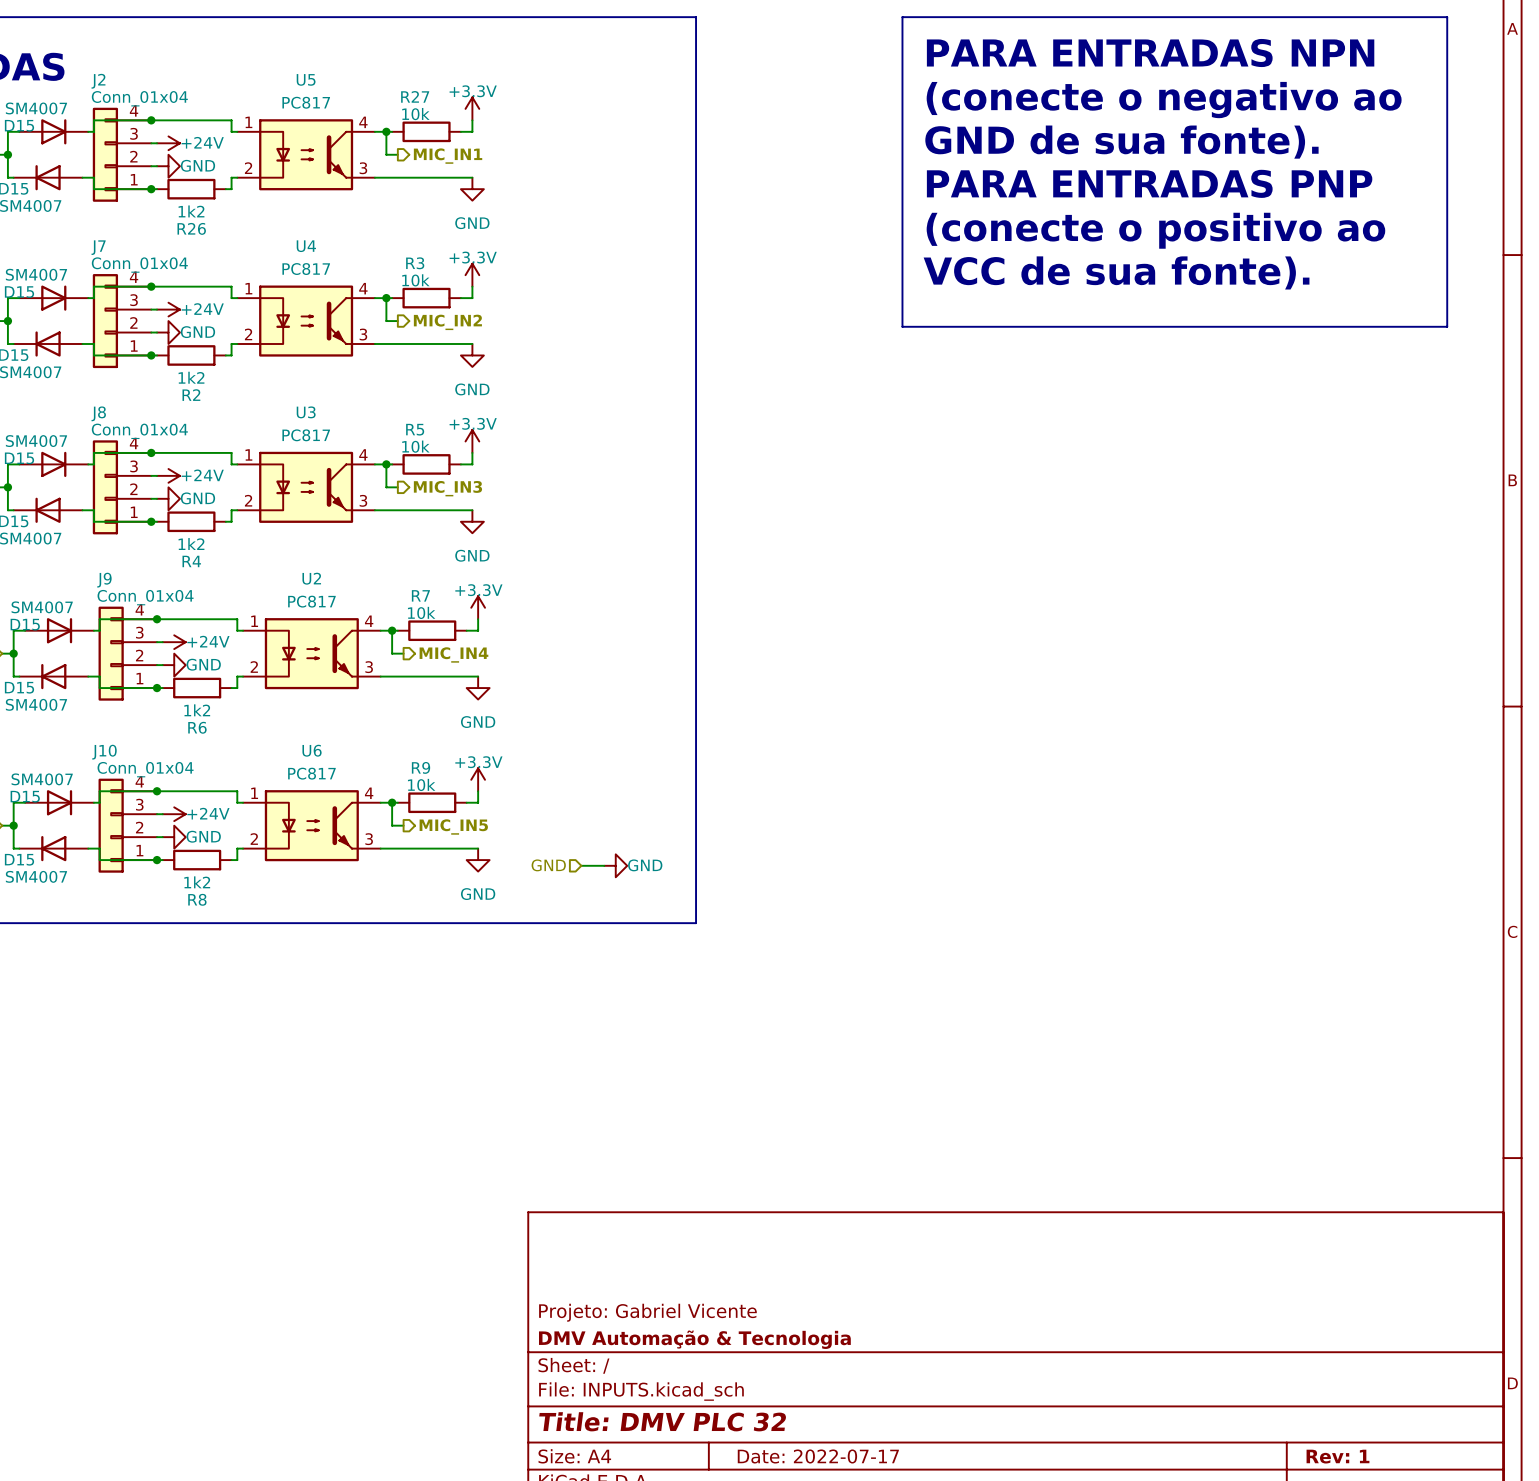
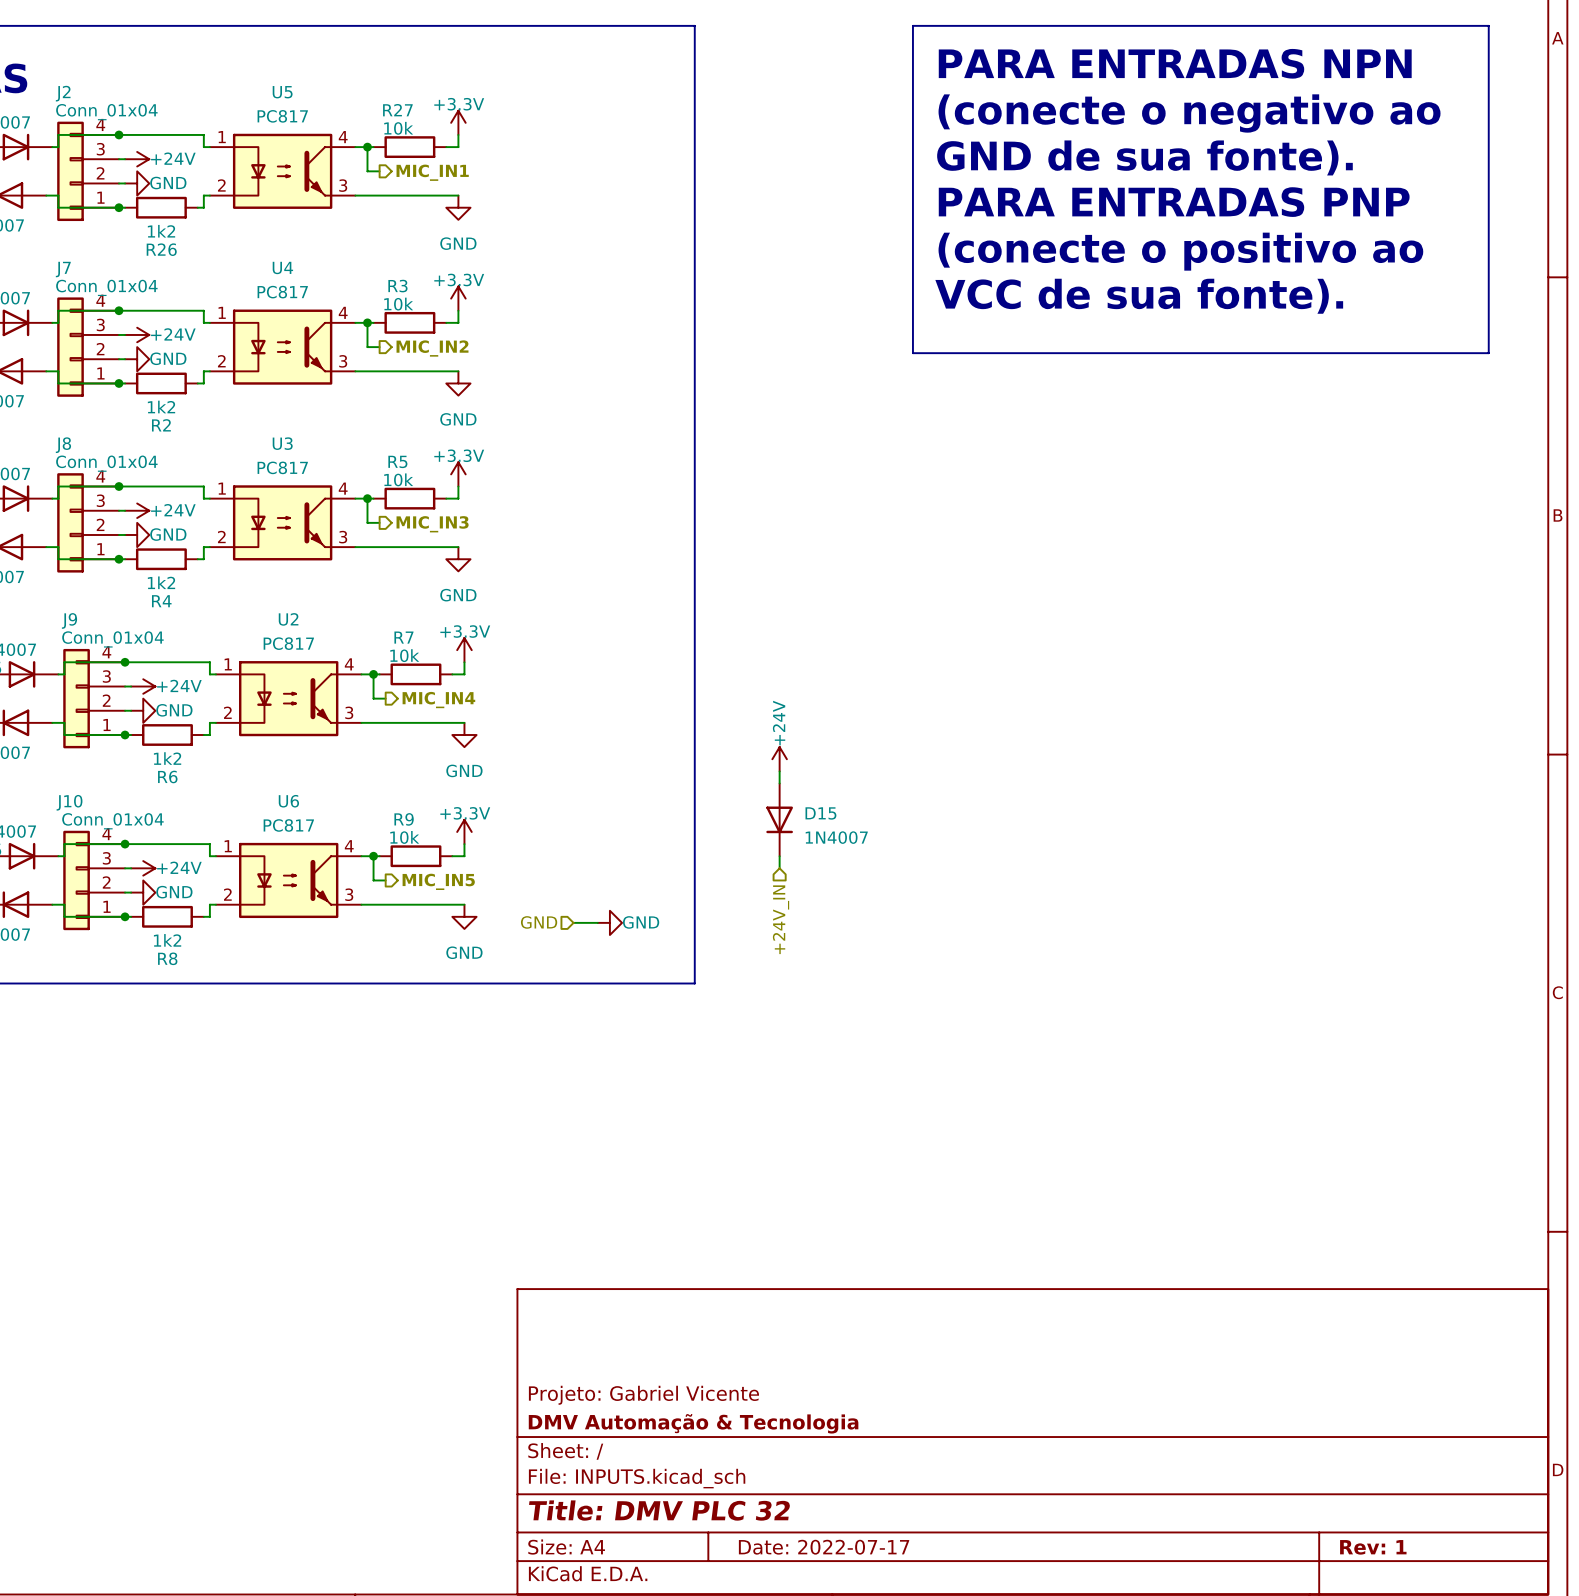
power symbol: none -> +24V (779, 759)
wire: none -> (779, 771) (779, 783)
D15: none -> 1N4007 (779, 819)
wire: none -> (779, 856) (779, 868)
hierarchical label: none -> +24V_IN (781, 919)

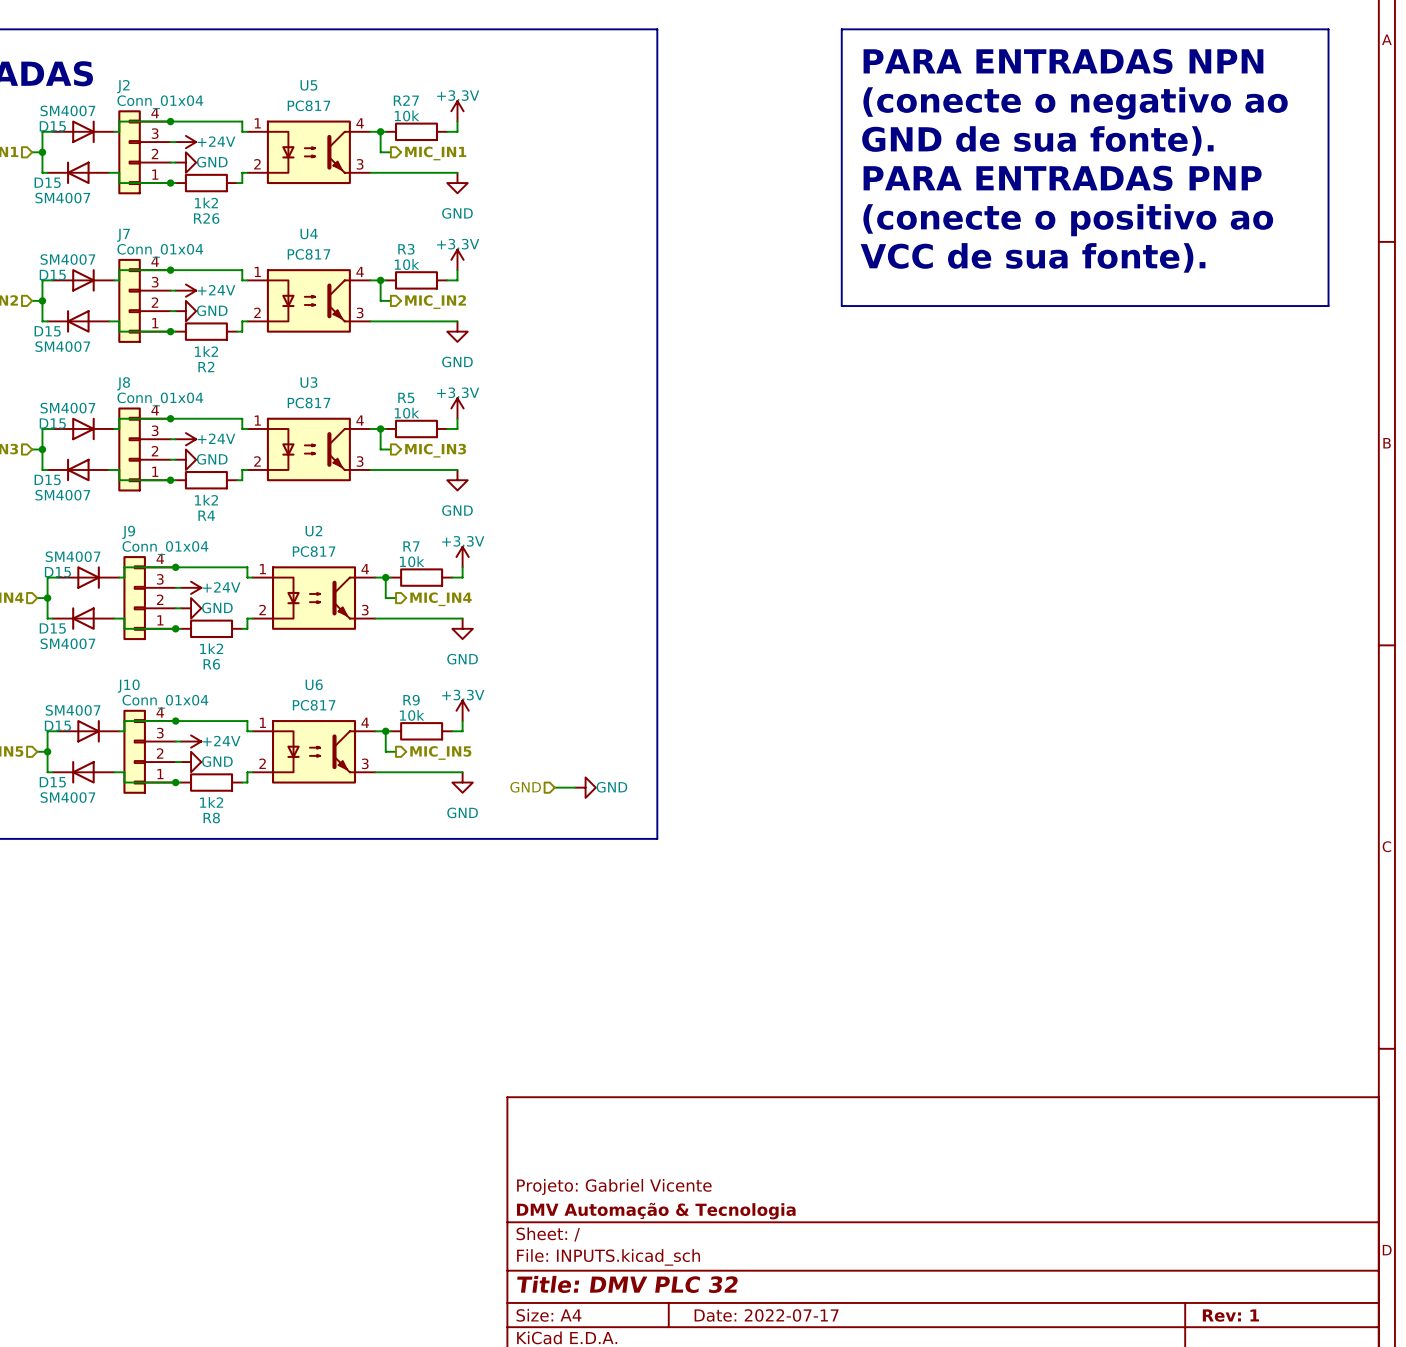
power symbol: +24V (779, 759) -> none
wire: (779, 771) (779, 783) -> none
D15: 1N4007 (779, 819) -> none
wire: (779, 856) (779, 868) -> none
hierarchical label: +24V_IN (781, 919) -> none

